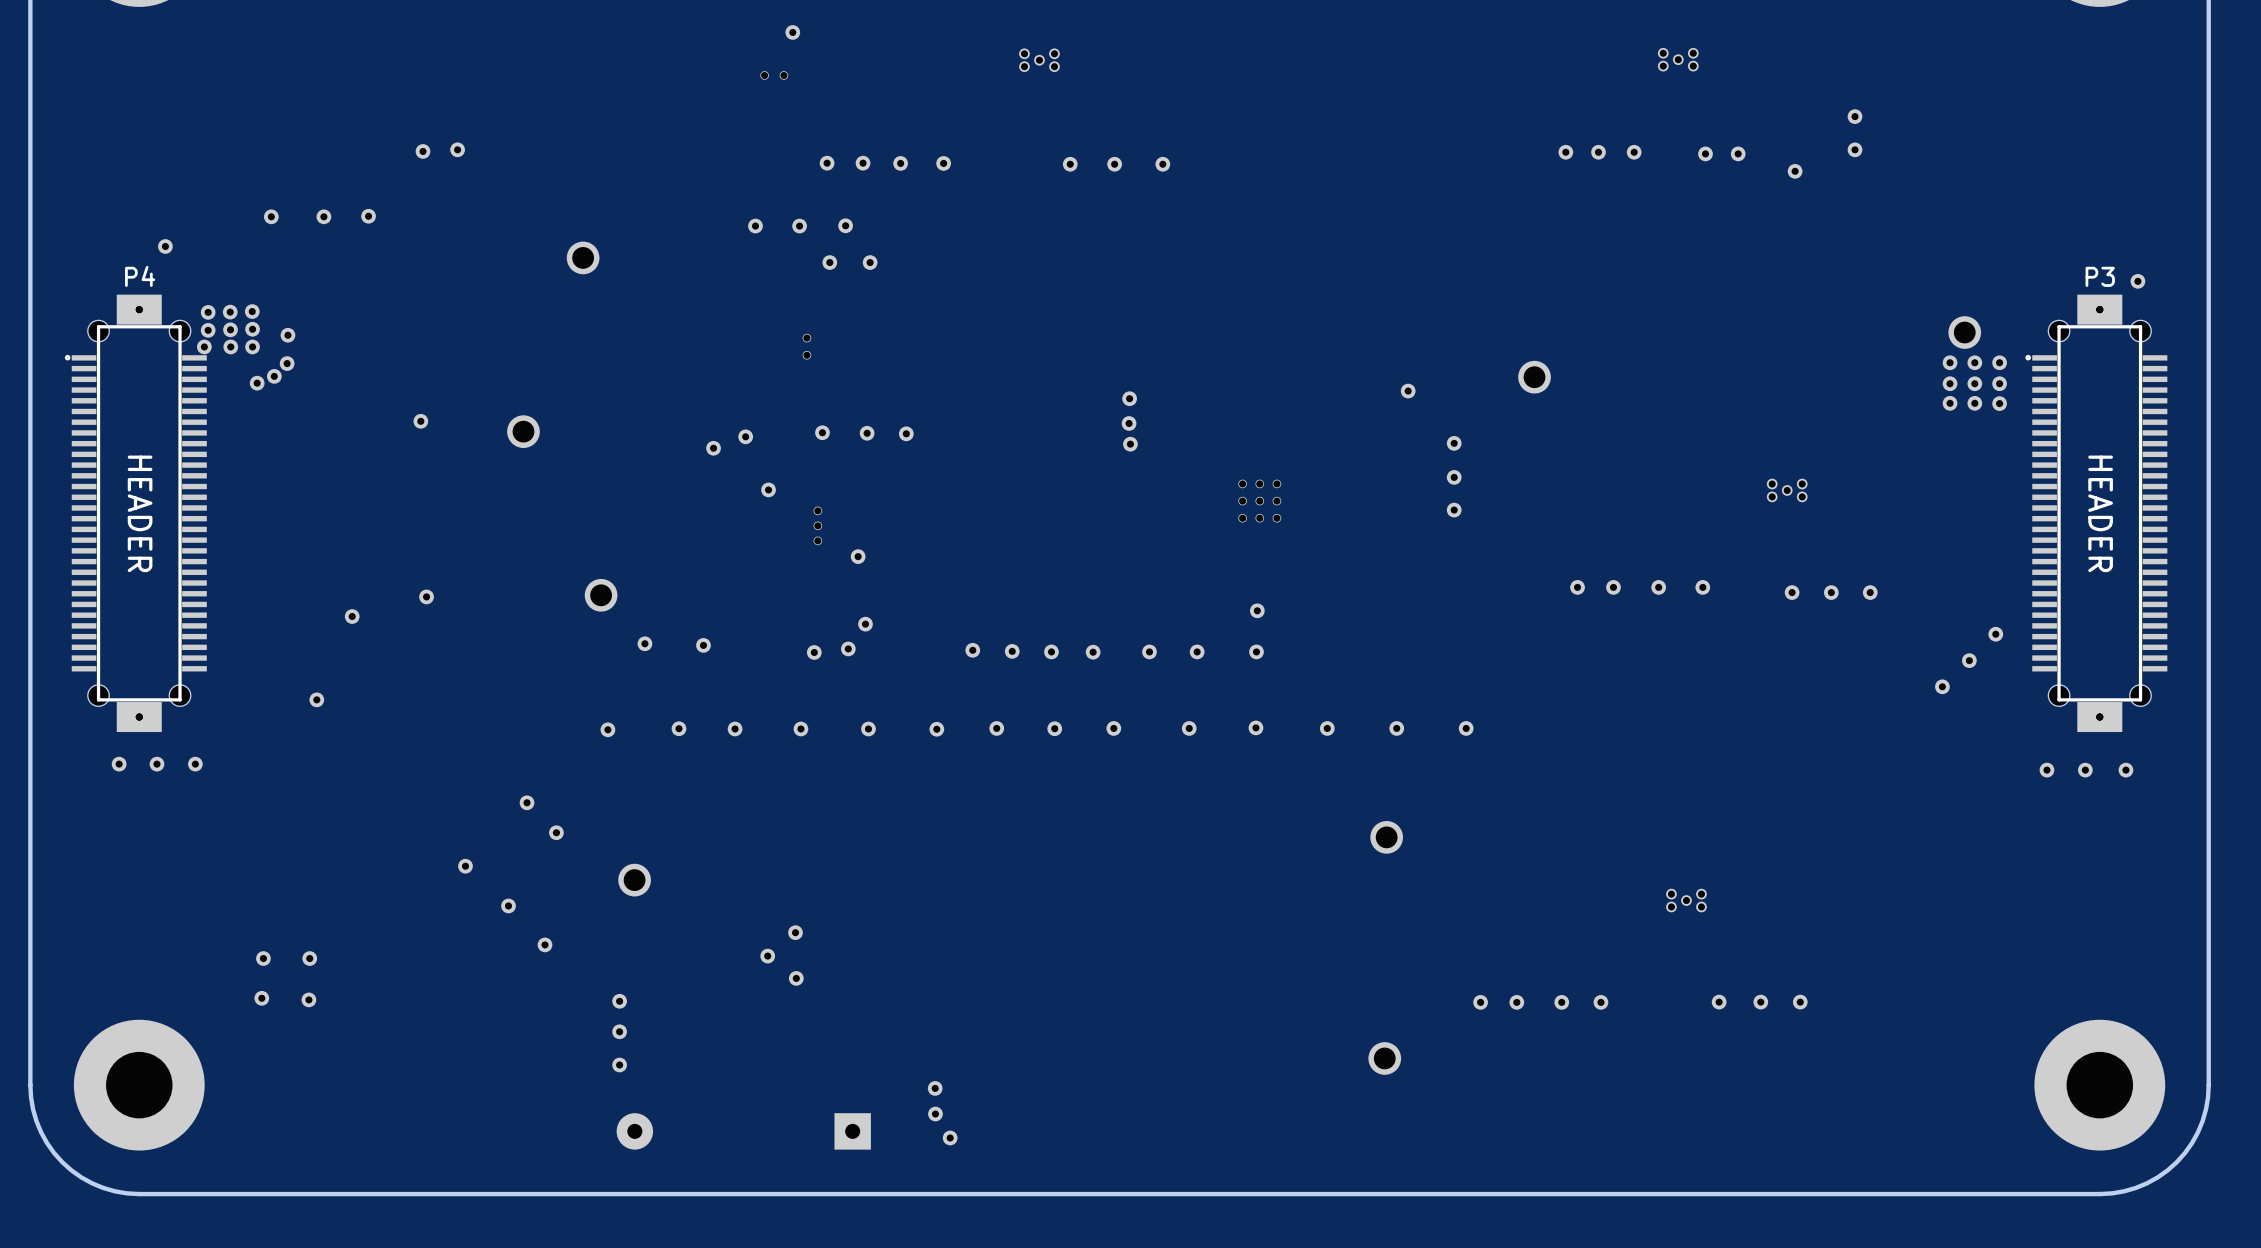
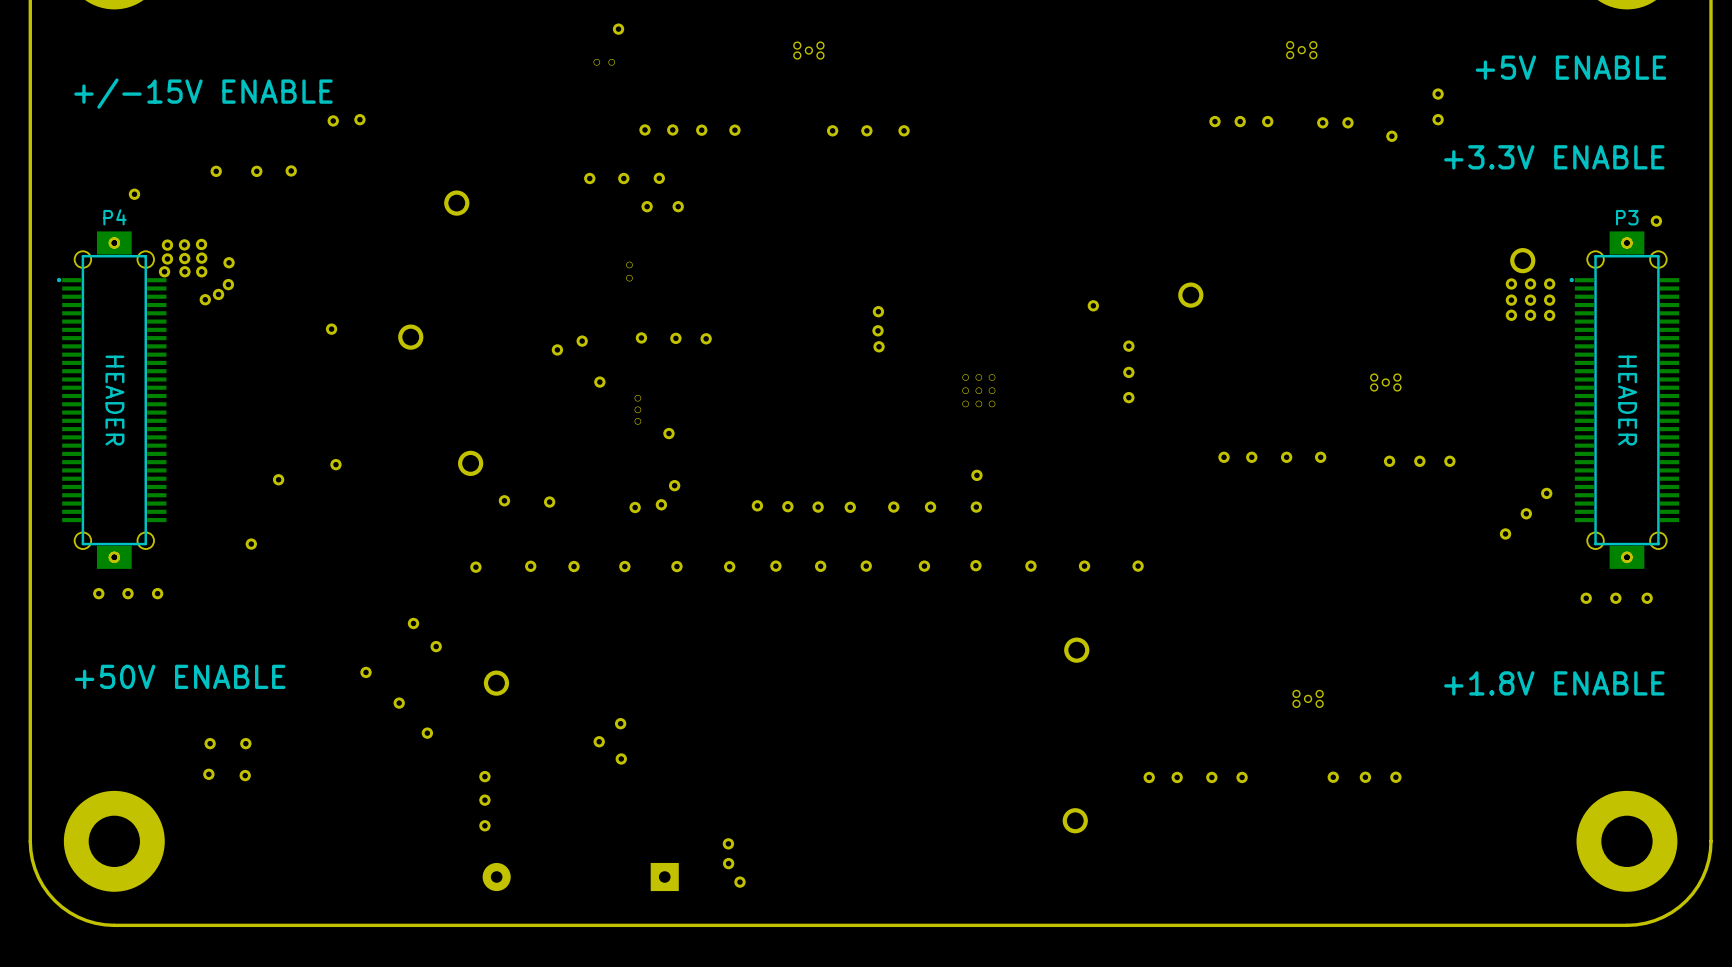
text: none -> +5V ENABLE (1570, 67)
text: none -> +/-15V ENABLE (203, 93)
text: none -> +3.3V ENABLE (1554, 157)
text: none -> +50V ENABLE (180, 676)
text: none -> +1.8V ENABLE (1554, 683)

